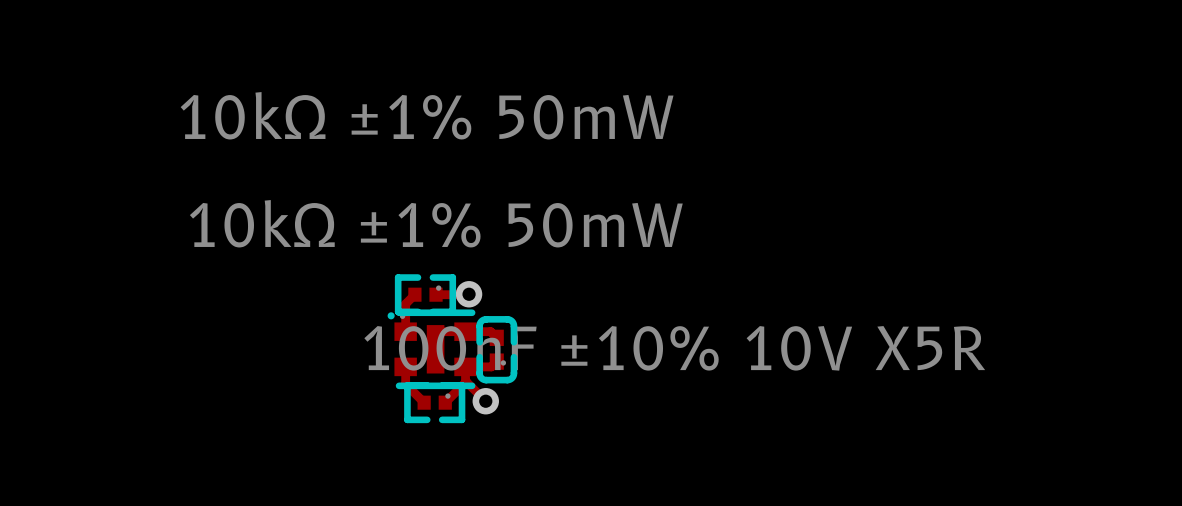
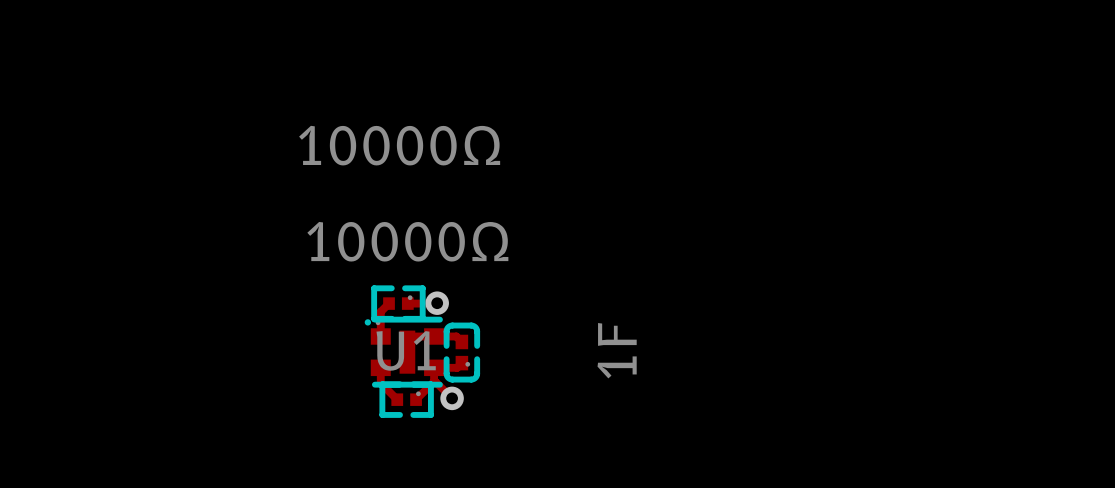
part value: 10kΩ ±1% 50mW (427, 115) -> 10000Ω (399, 145)
part value: 10kΩ ±1% 50mW (436, 223) -> 10000Ω (407, 241)
U1 name: none -> U1 (406, 350)
part value: 100nF ±10% 10V X5R (674, 348) -> 1F (617, 350)

